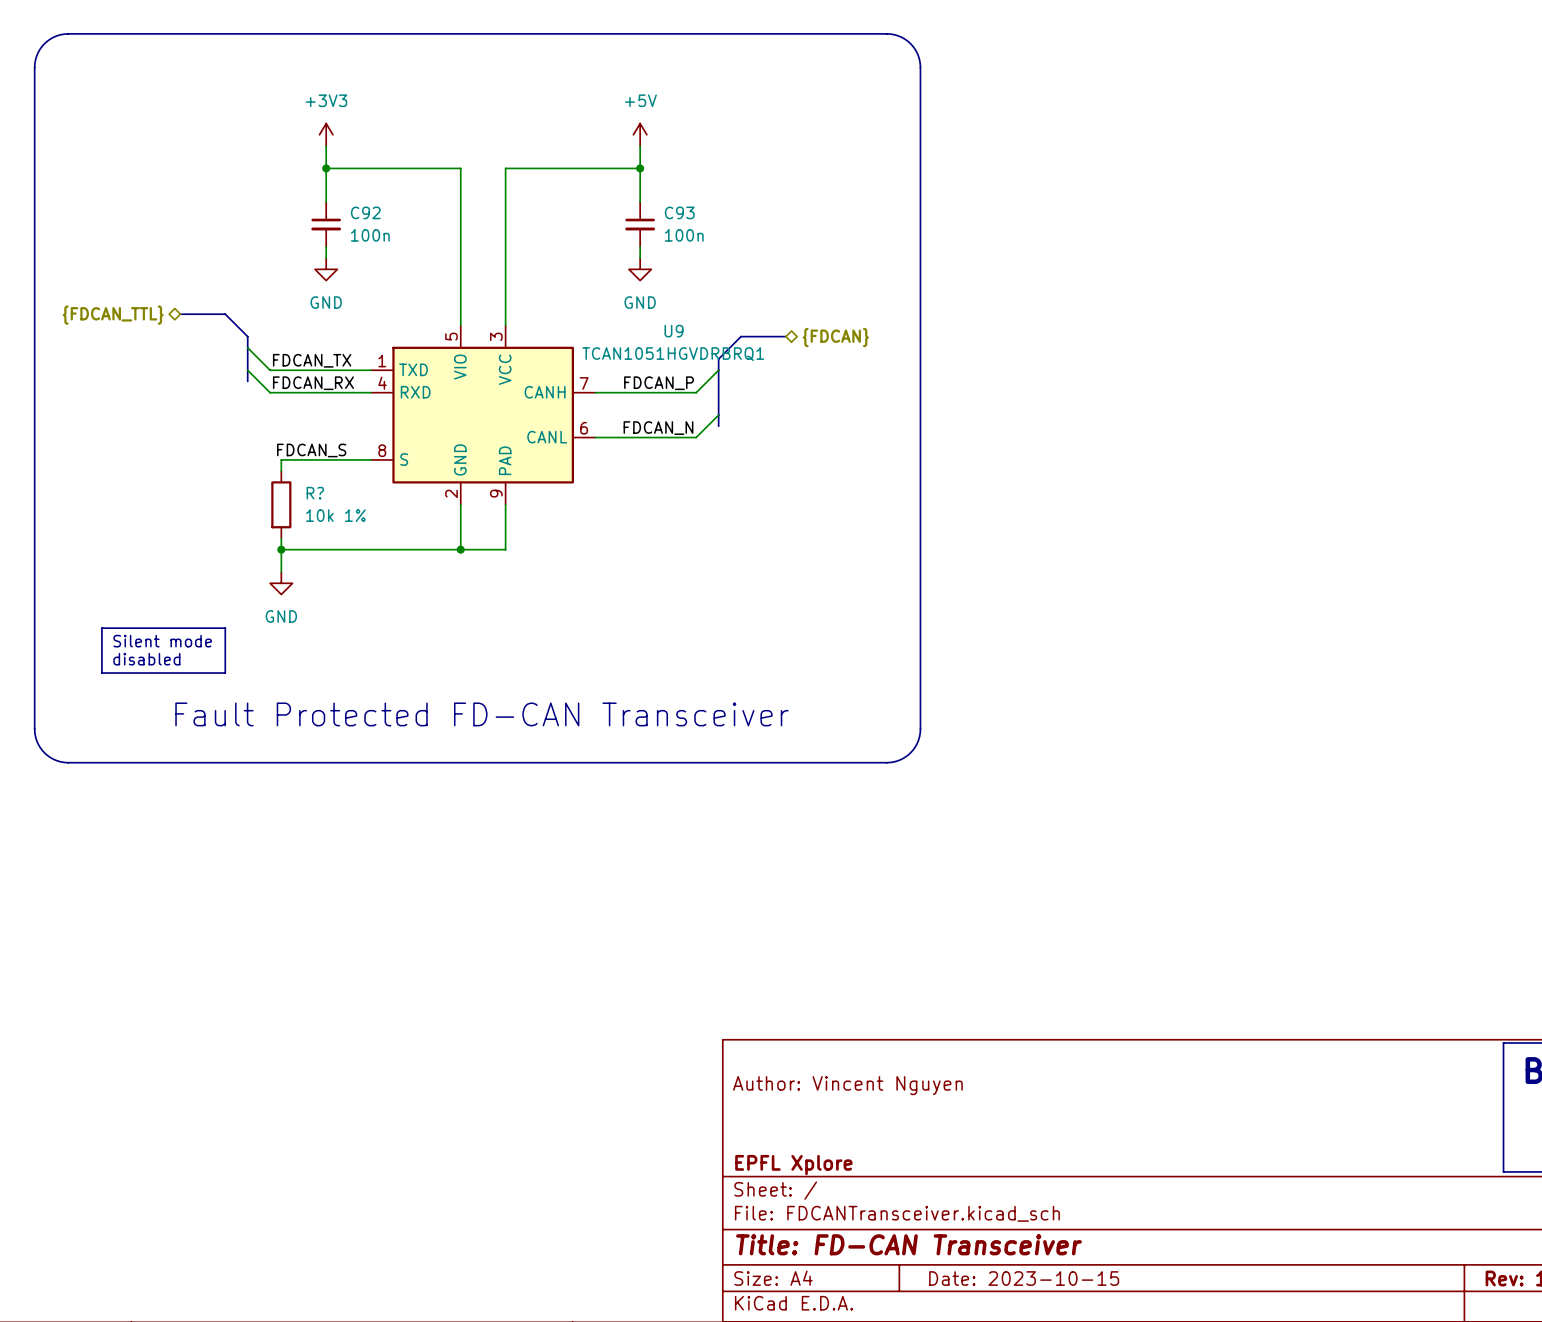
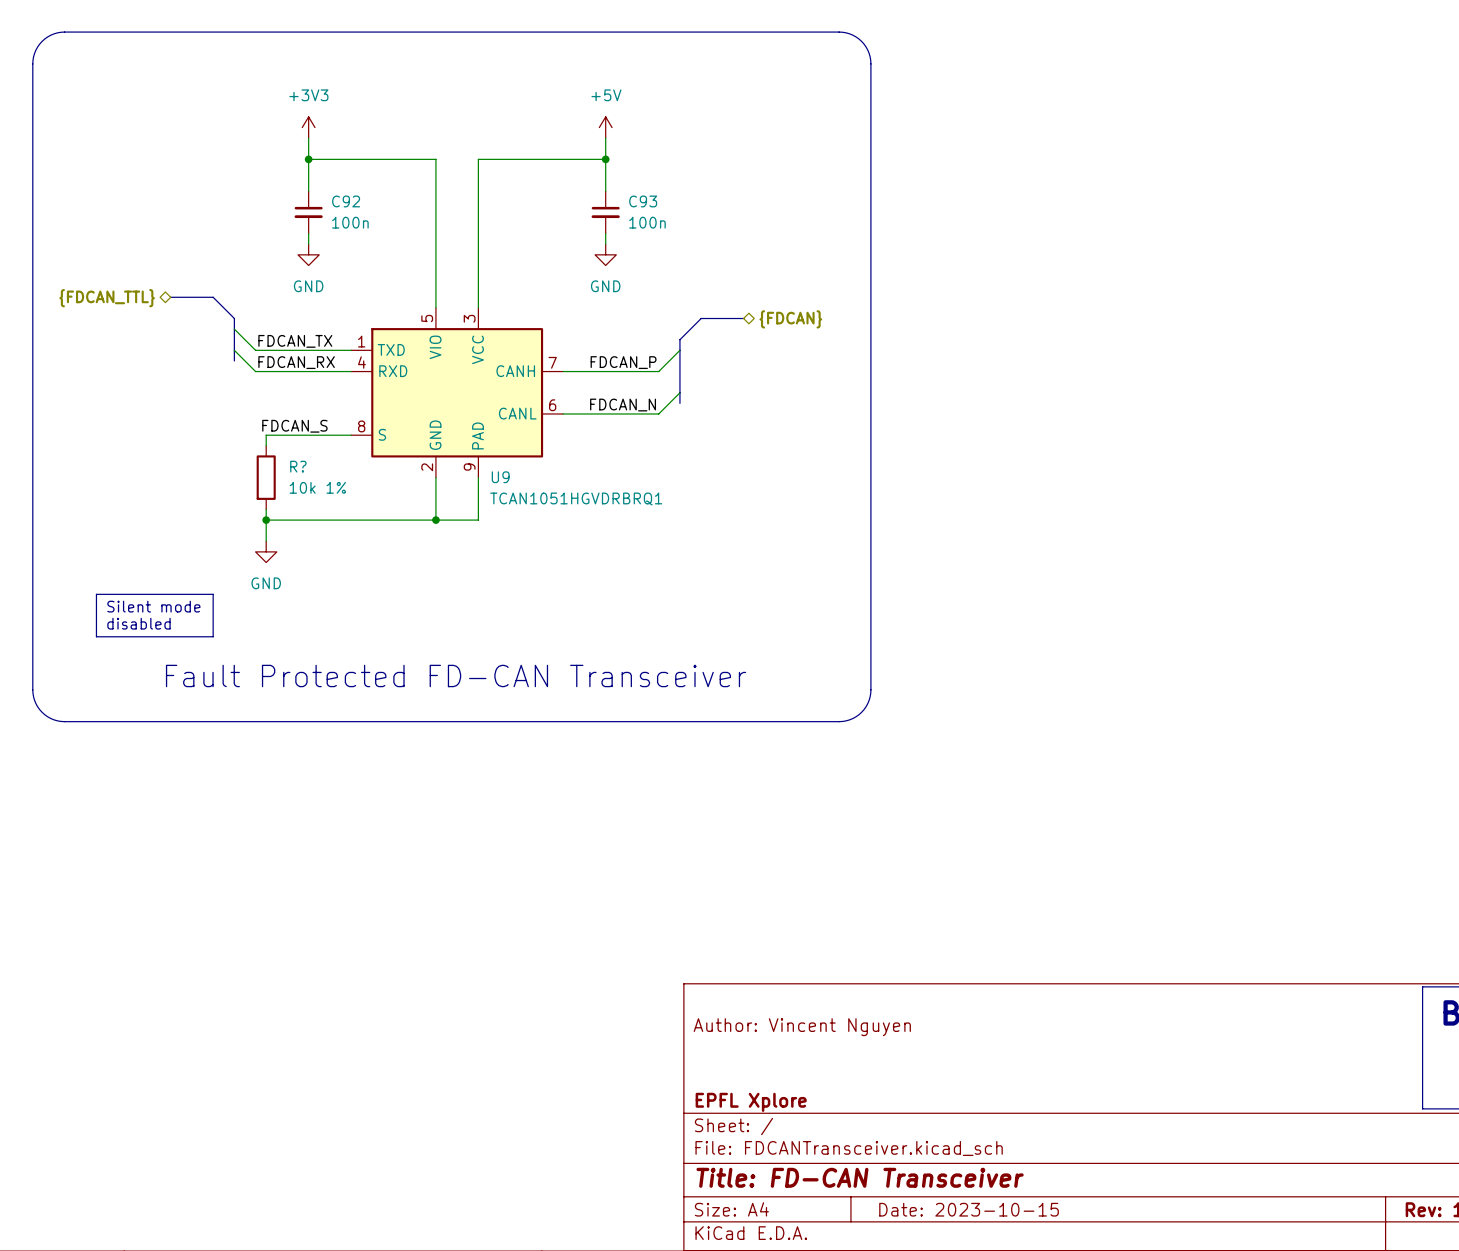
U9 name position: U9 (674, 331) -> U9 (500, 477)
U9 value position: TCAN1051HGVDRBRQ1 (673, 354) -> TCAN1051HGVDRBRQ1 (576, 498)

